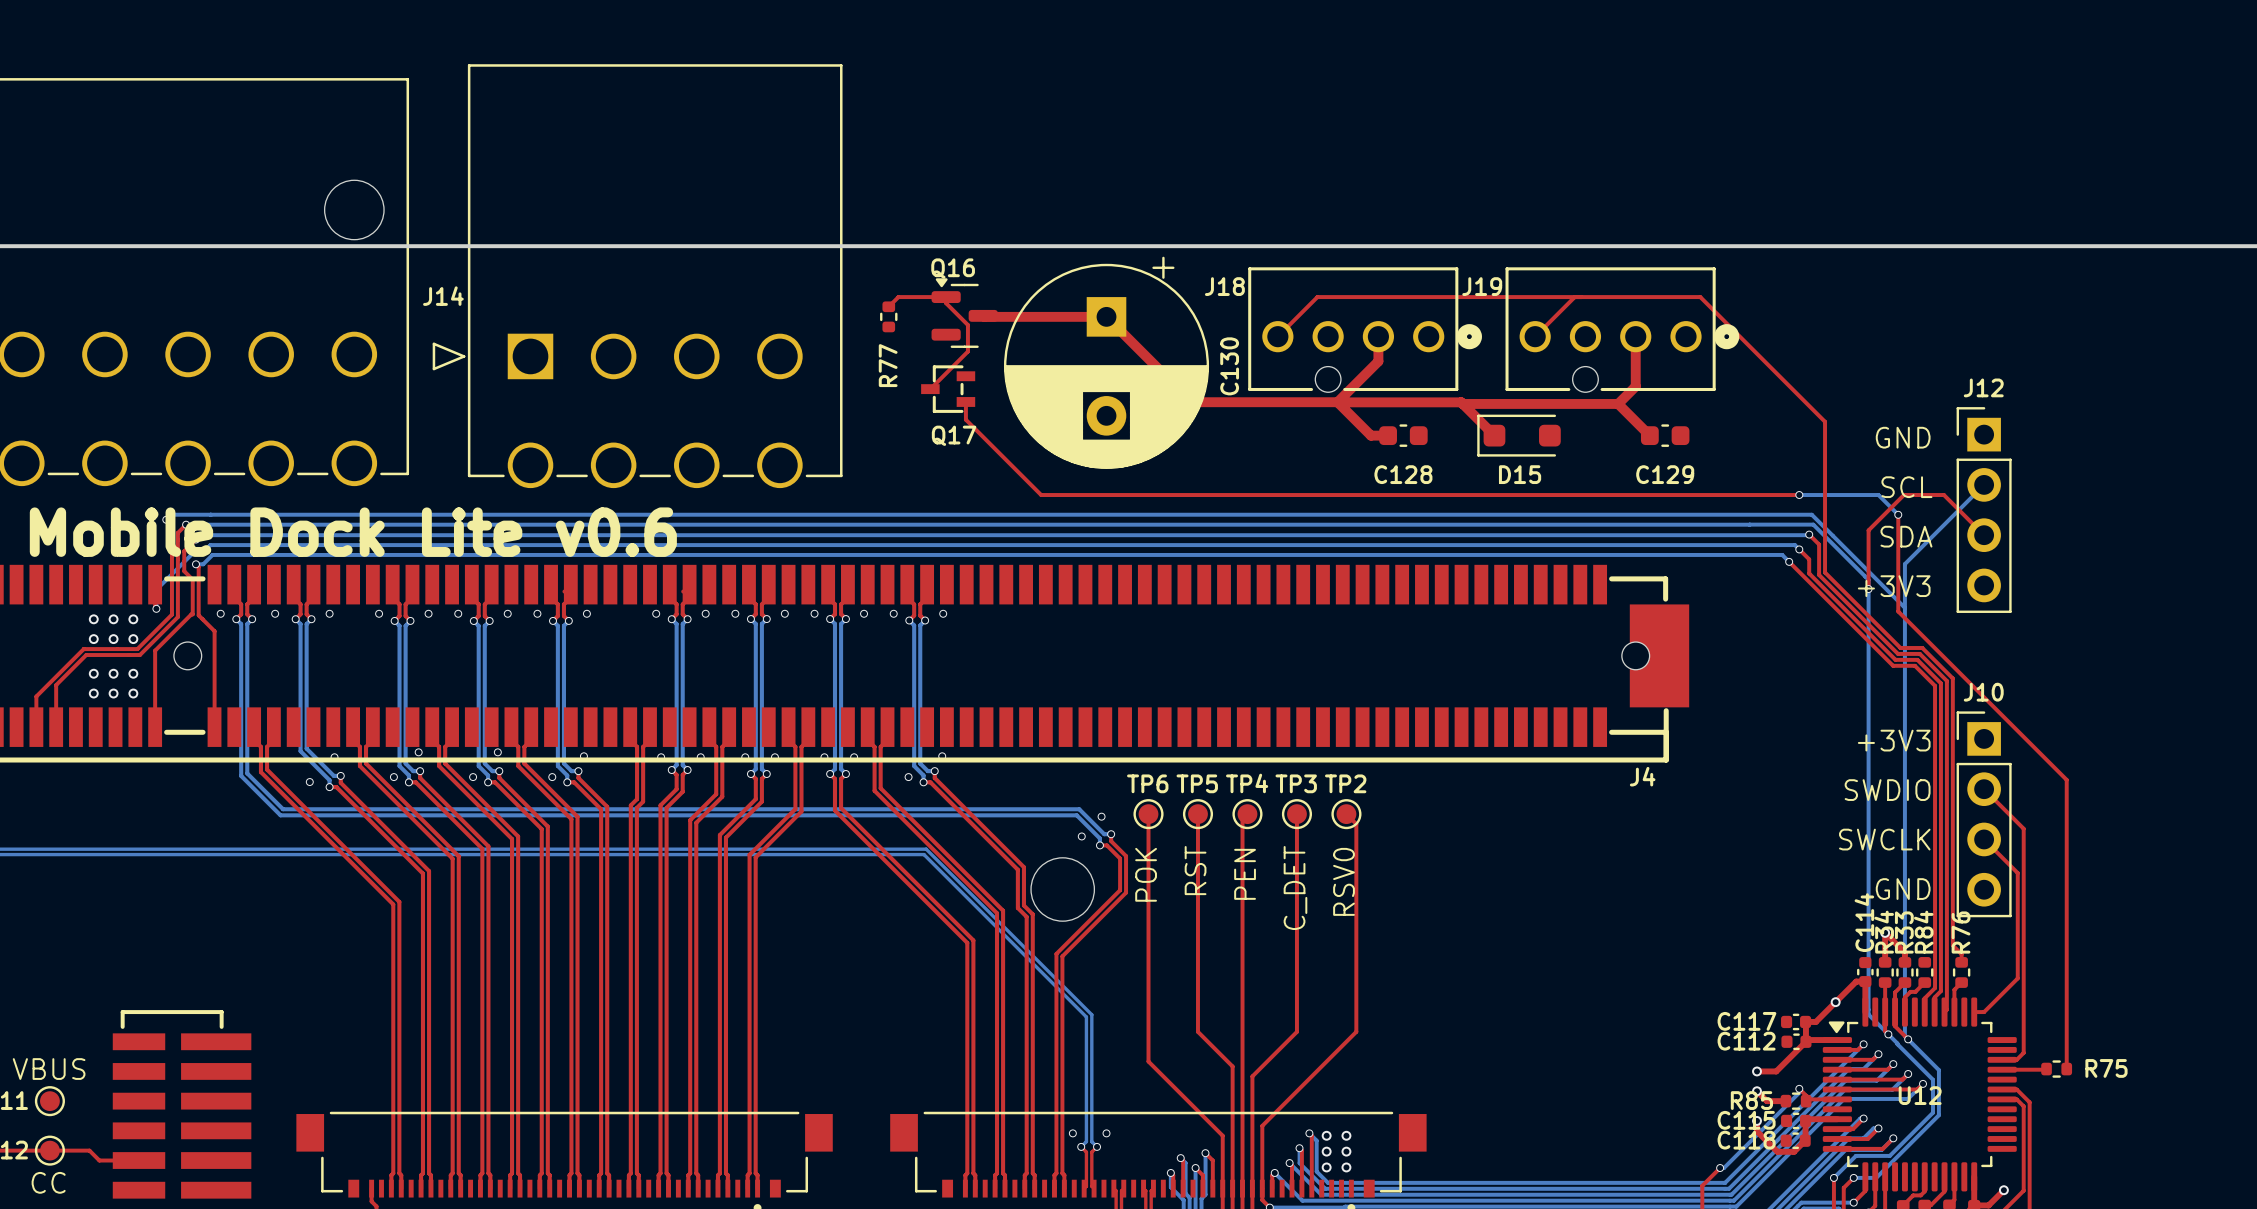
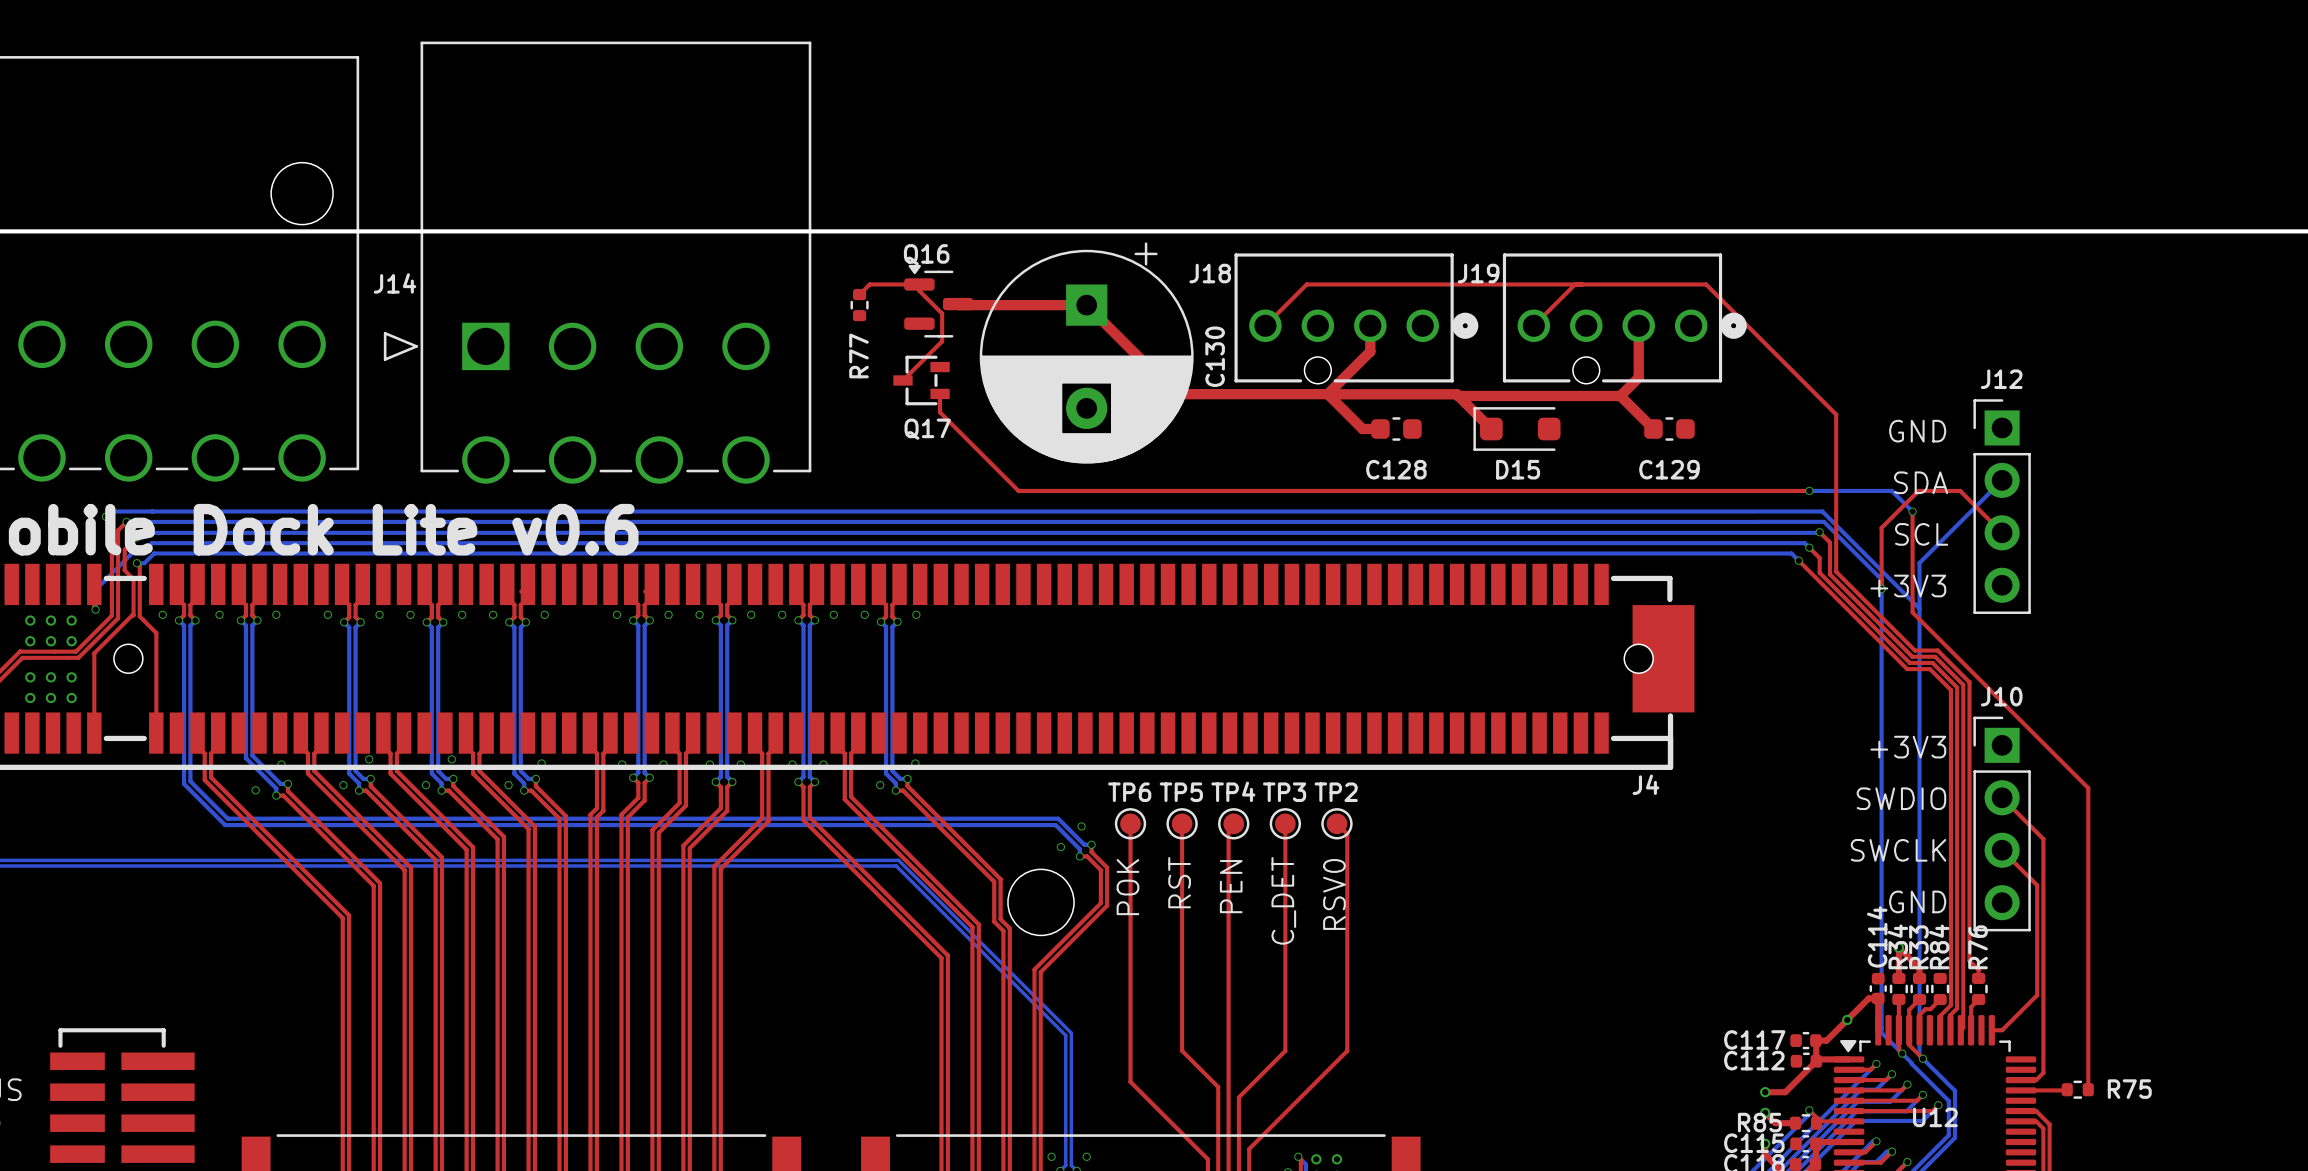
text: SCL (1906, 487) -> SDA (1921, 482)
text: SDA (1906, 536) -> SCL (1921, 534)

